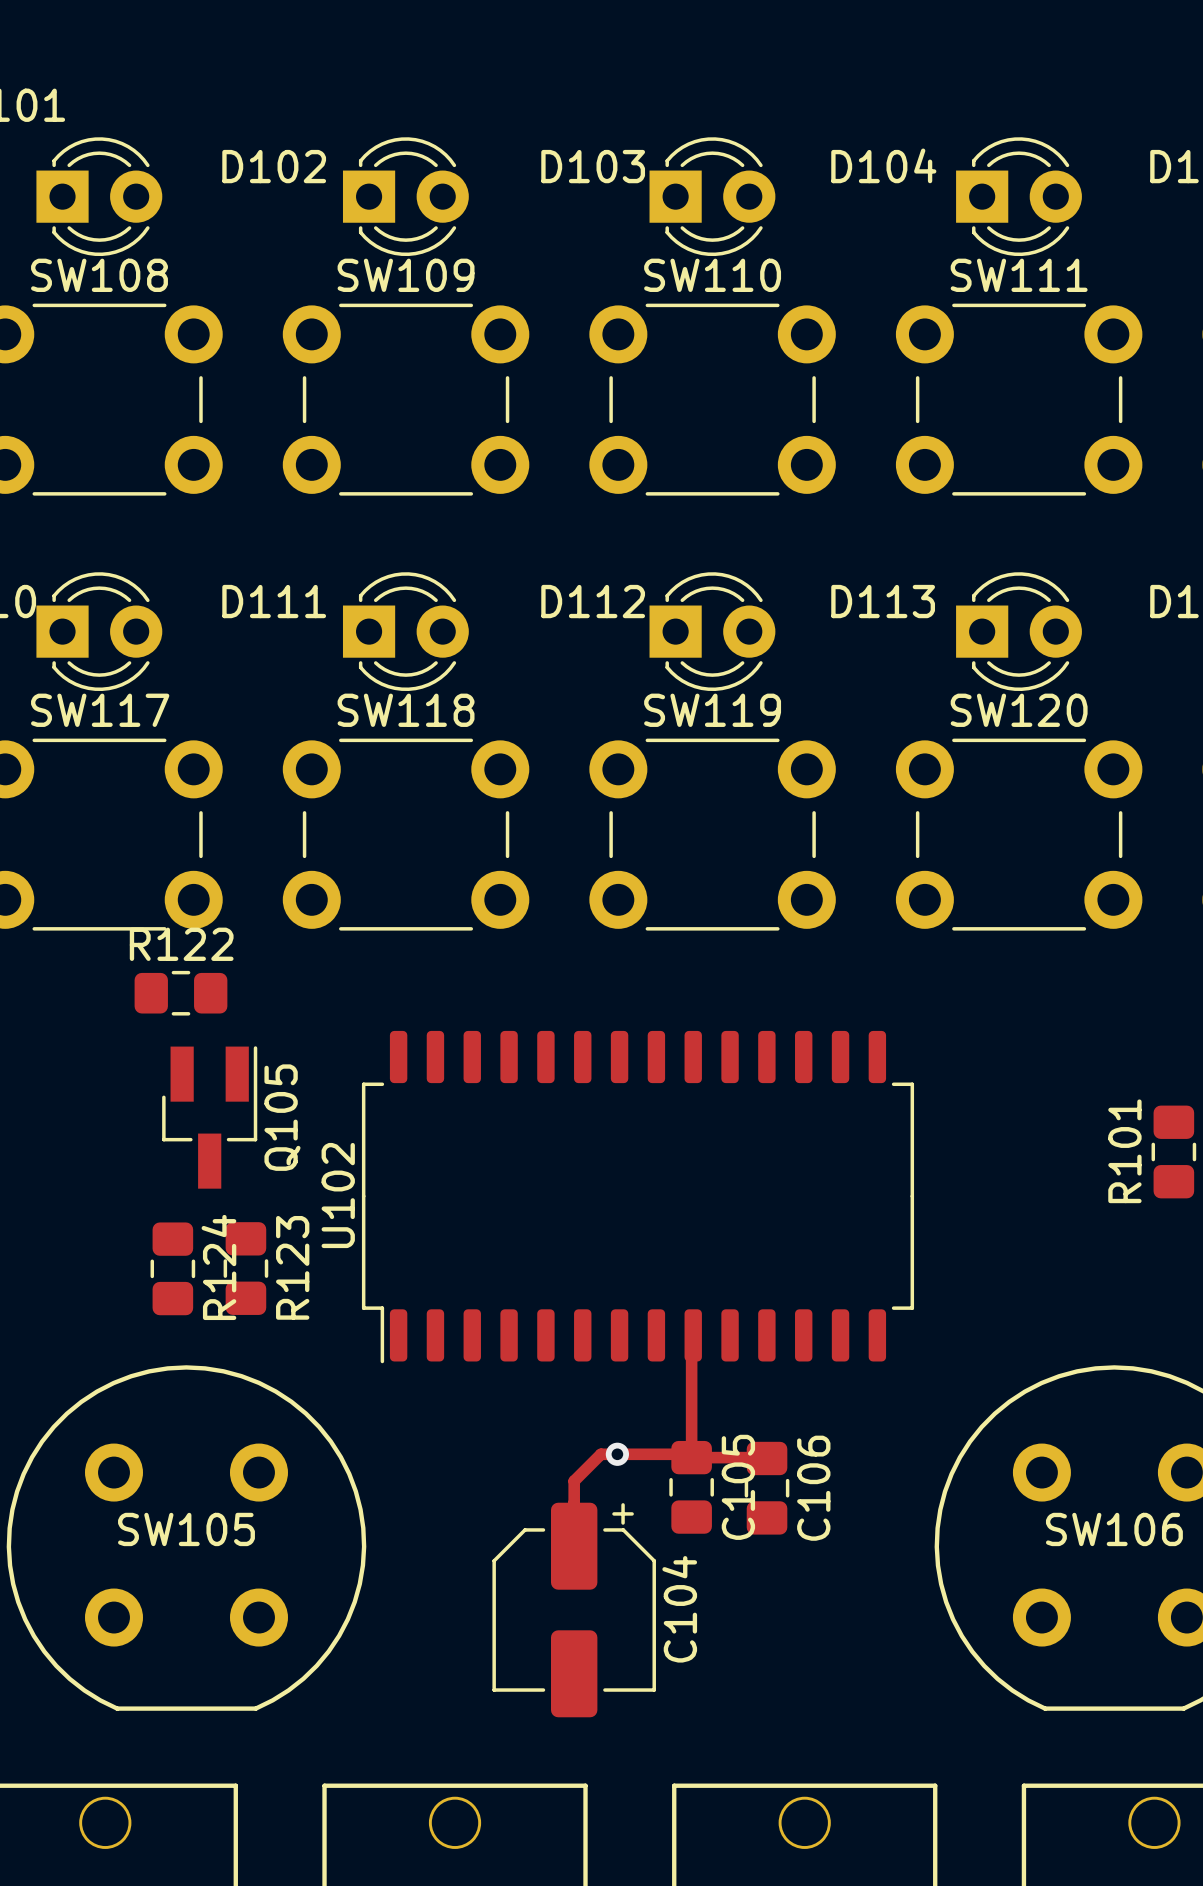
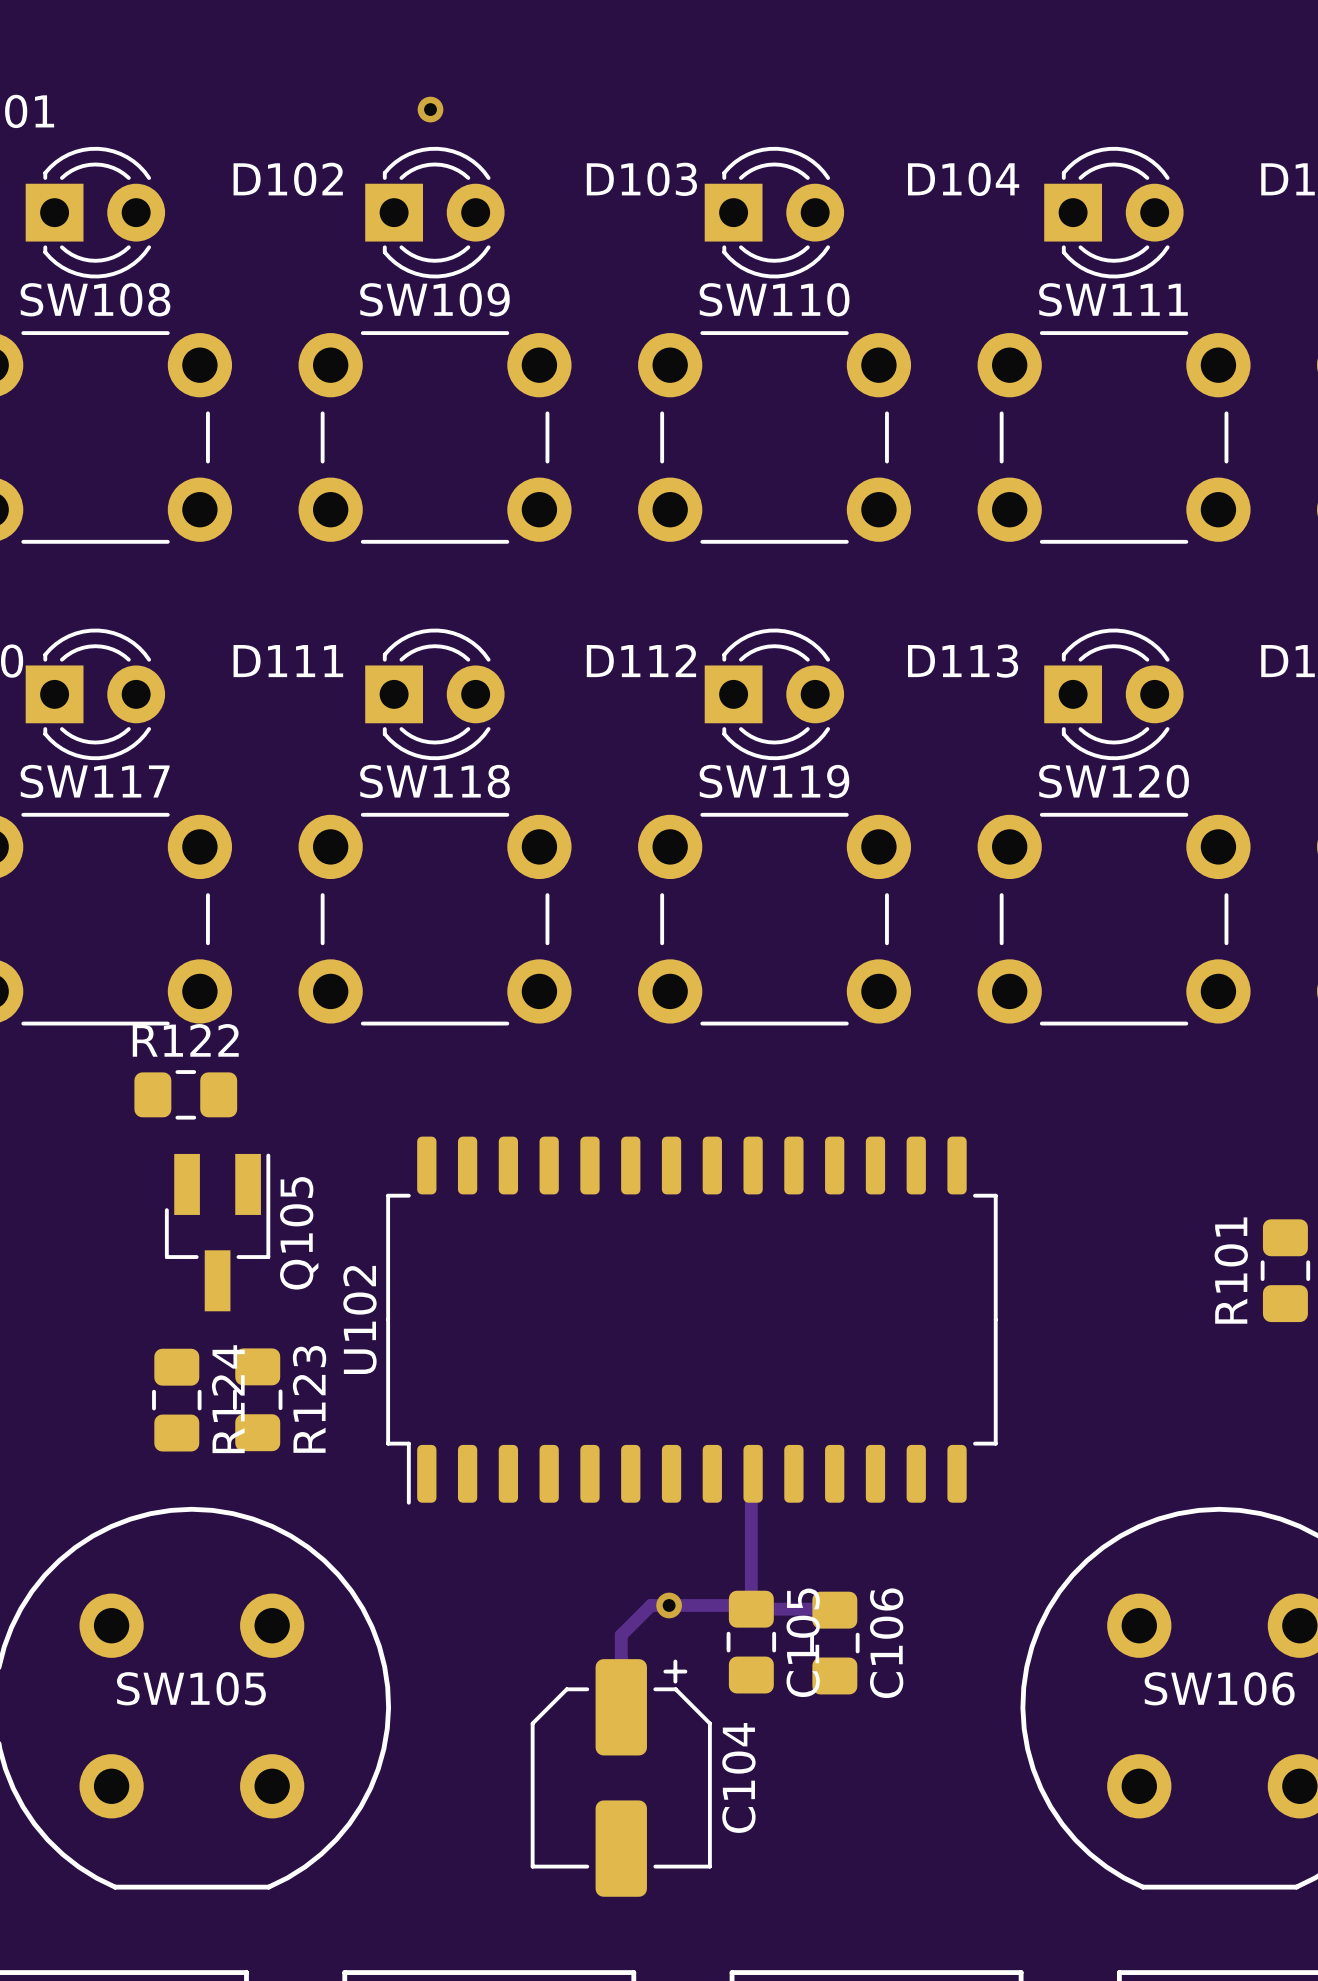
via: none -> (430, 109)

